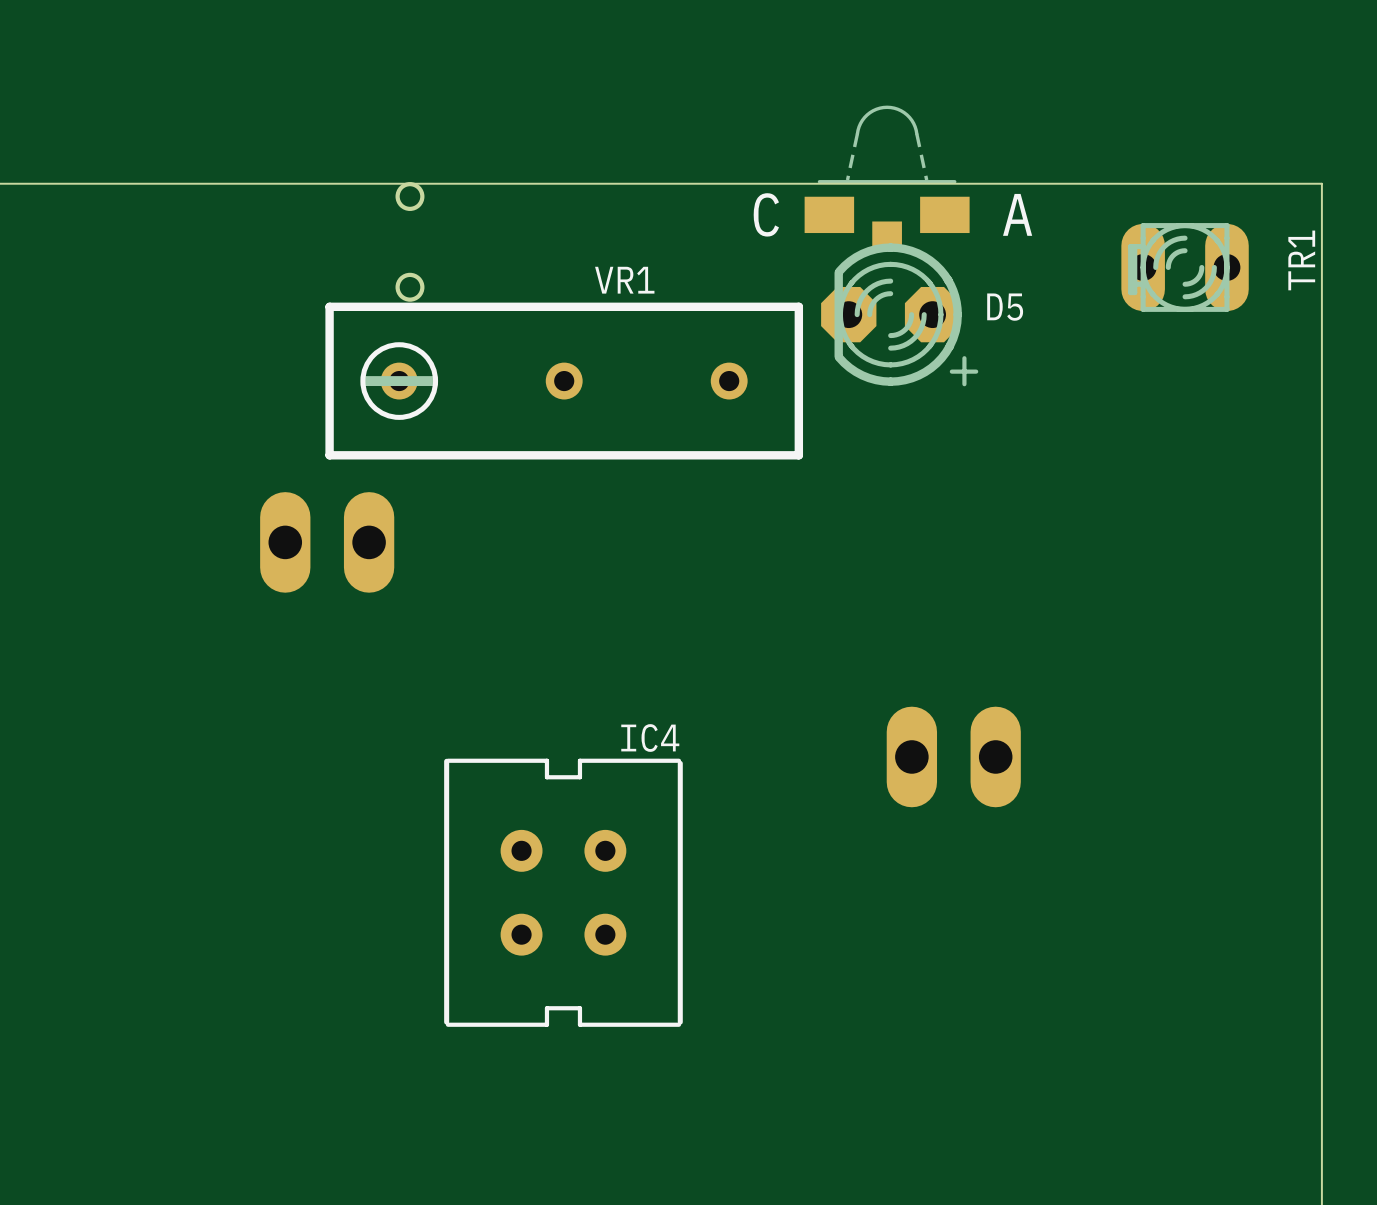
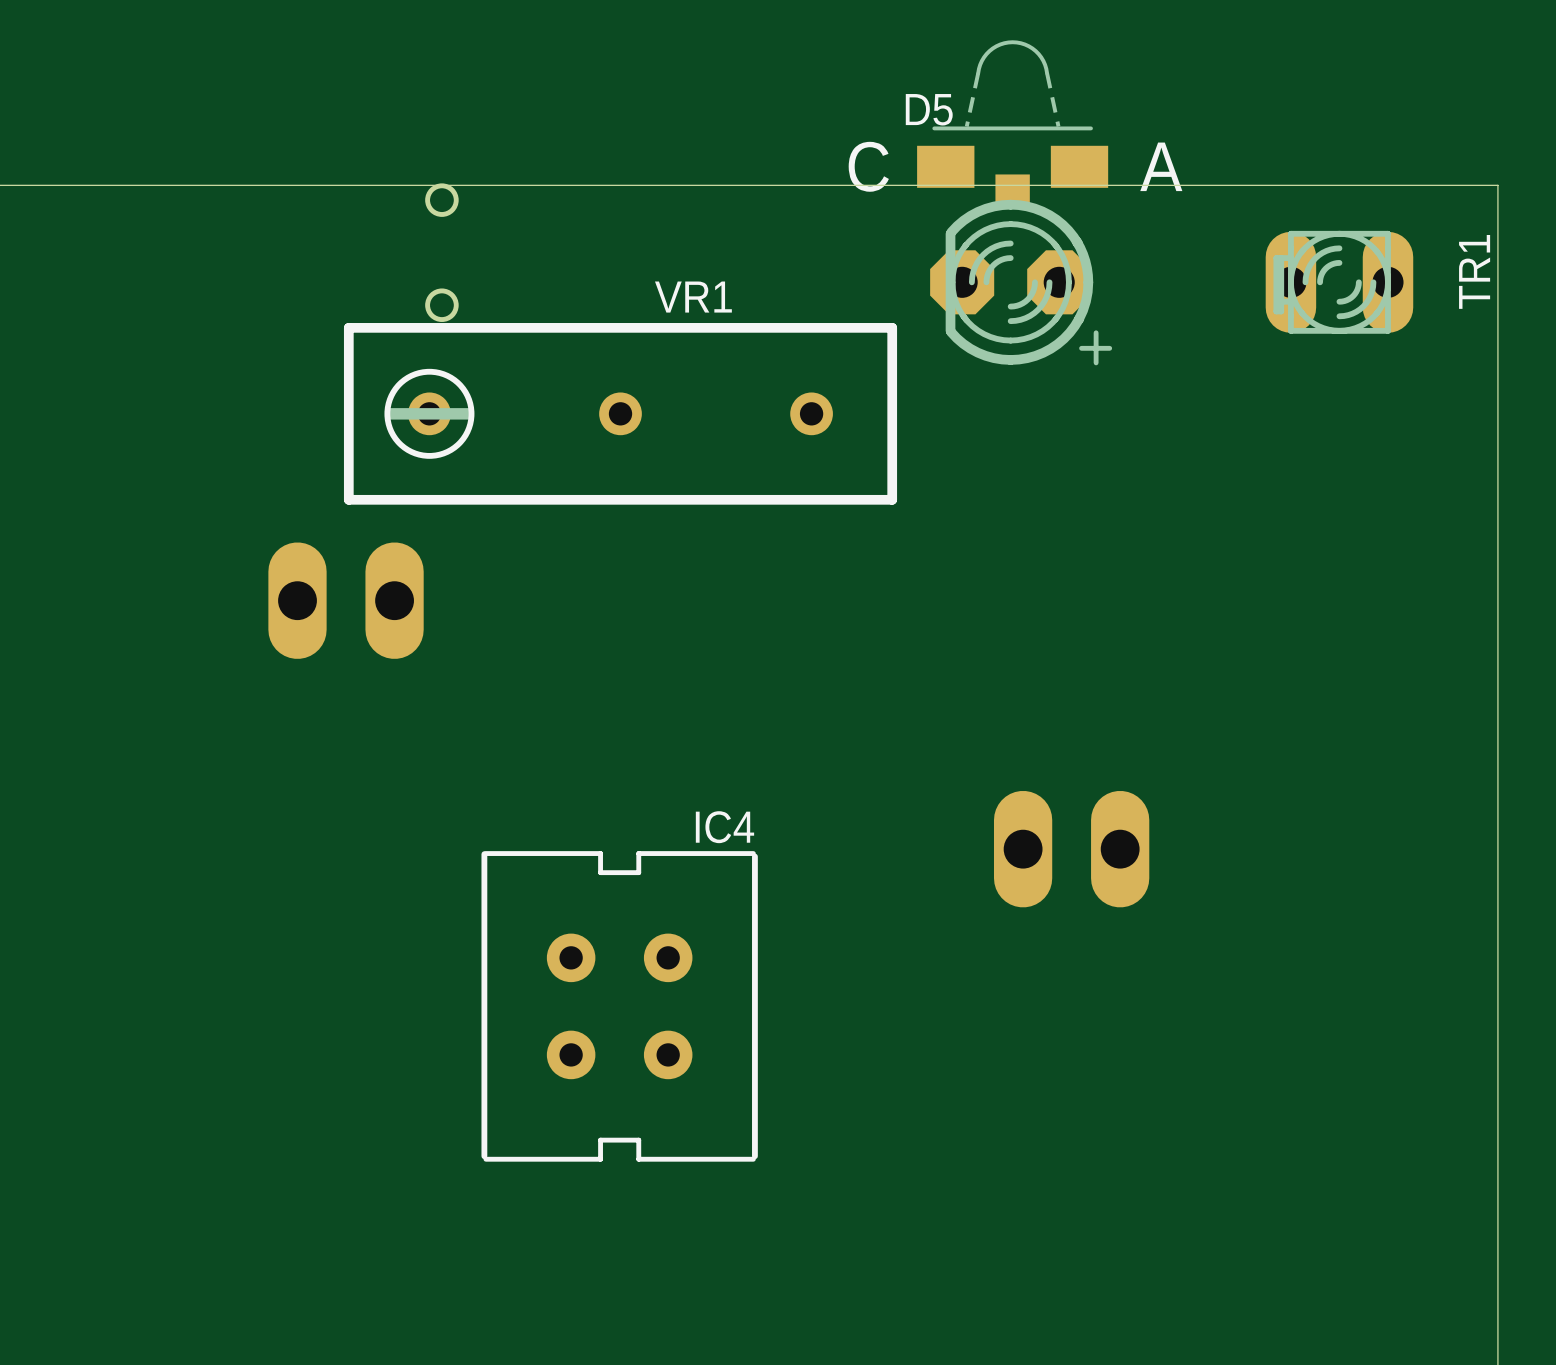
part position: (887, 178) -> (1012, 124)
D5 name position: D5 (1005, 307) -> D5 (929, 109)
D5 position: (899, 314) -> (1021, 282)

